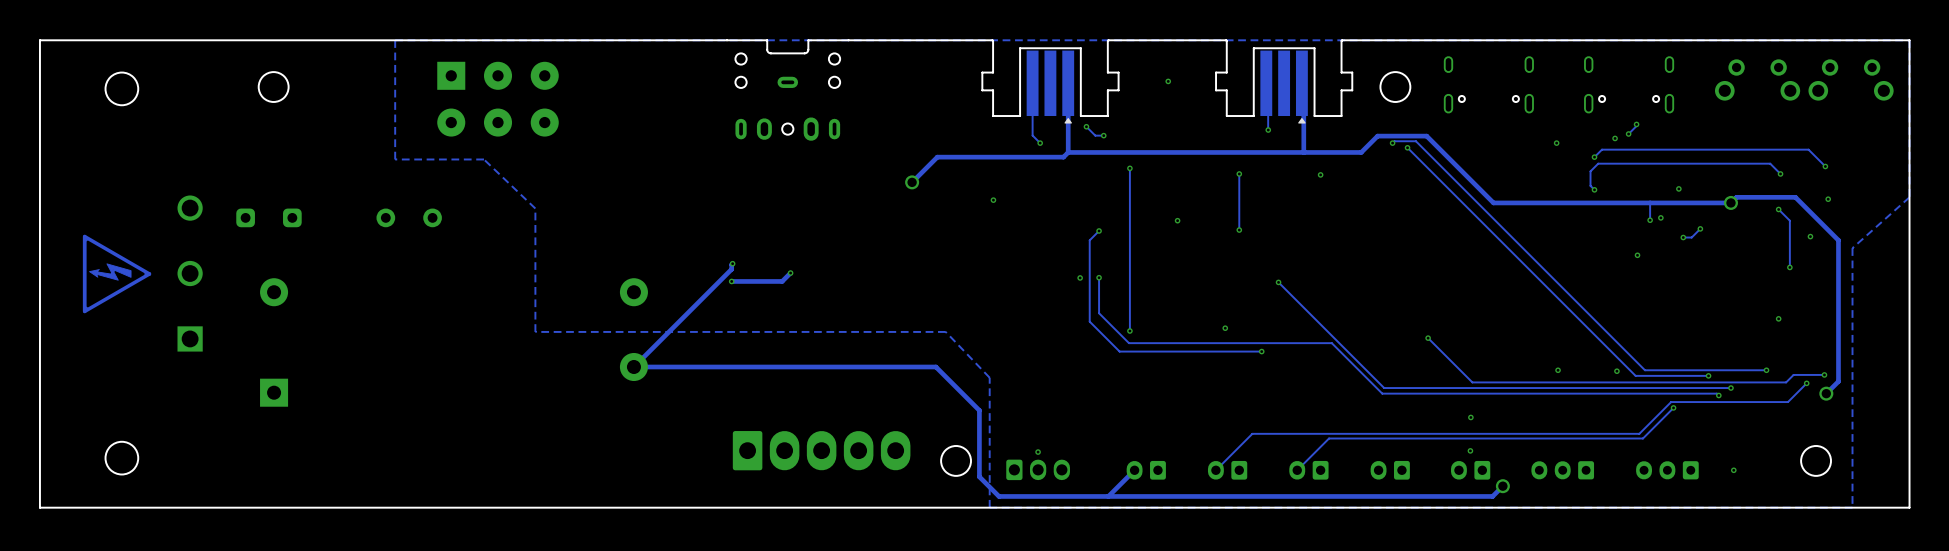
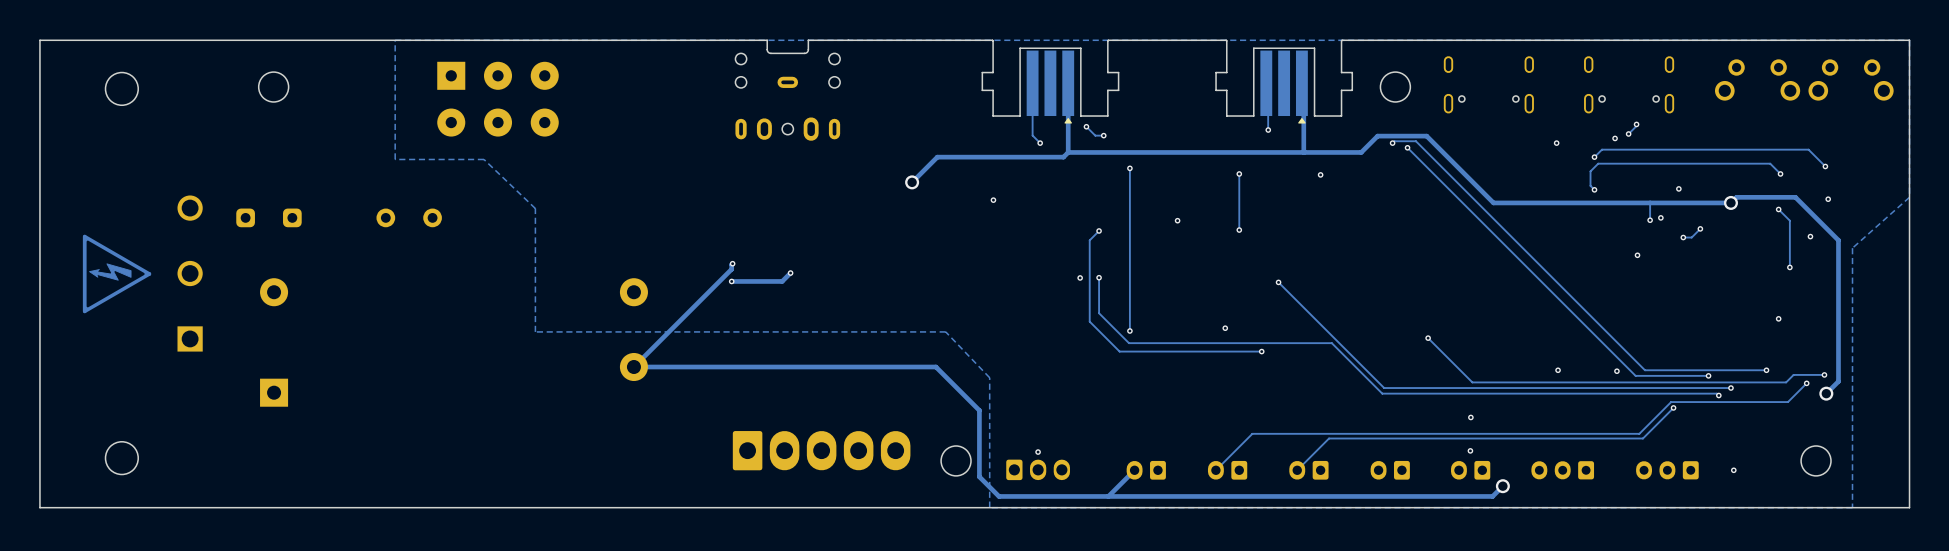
via: (1168, 81) -> none

